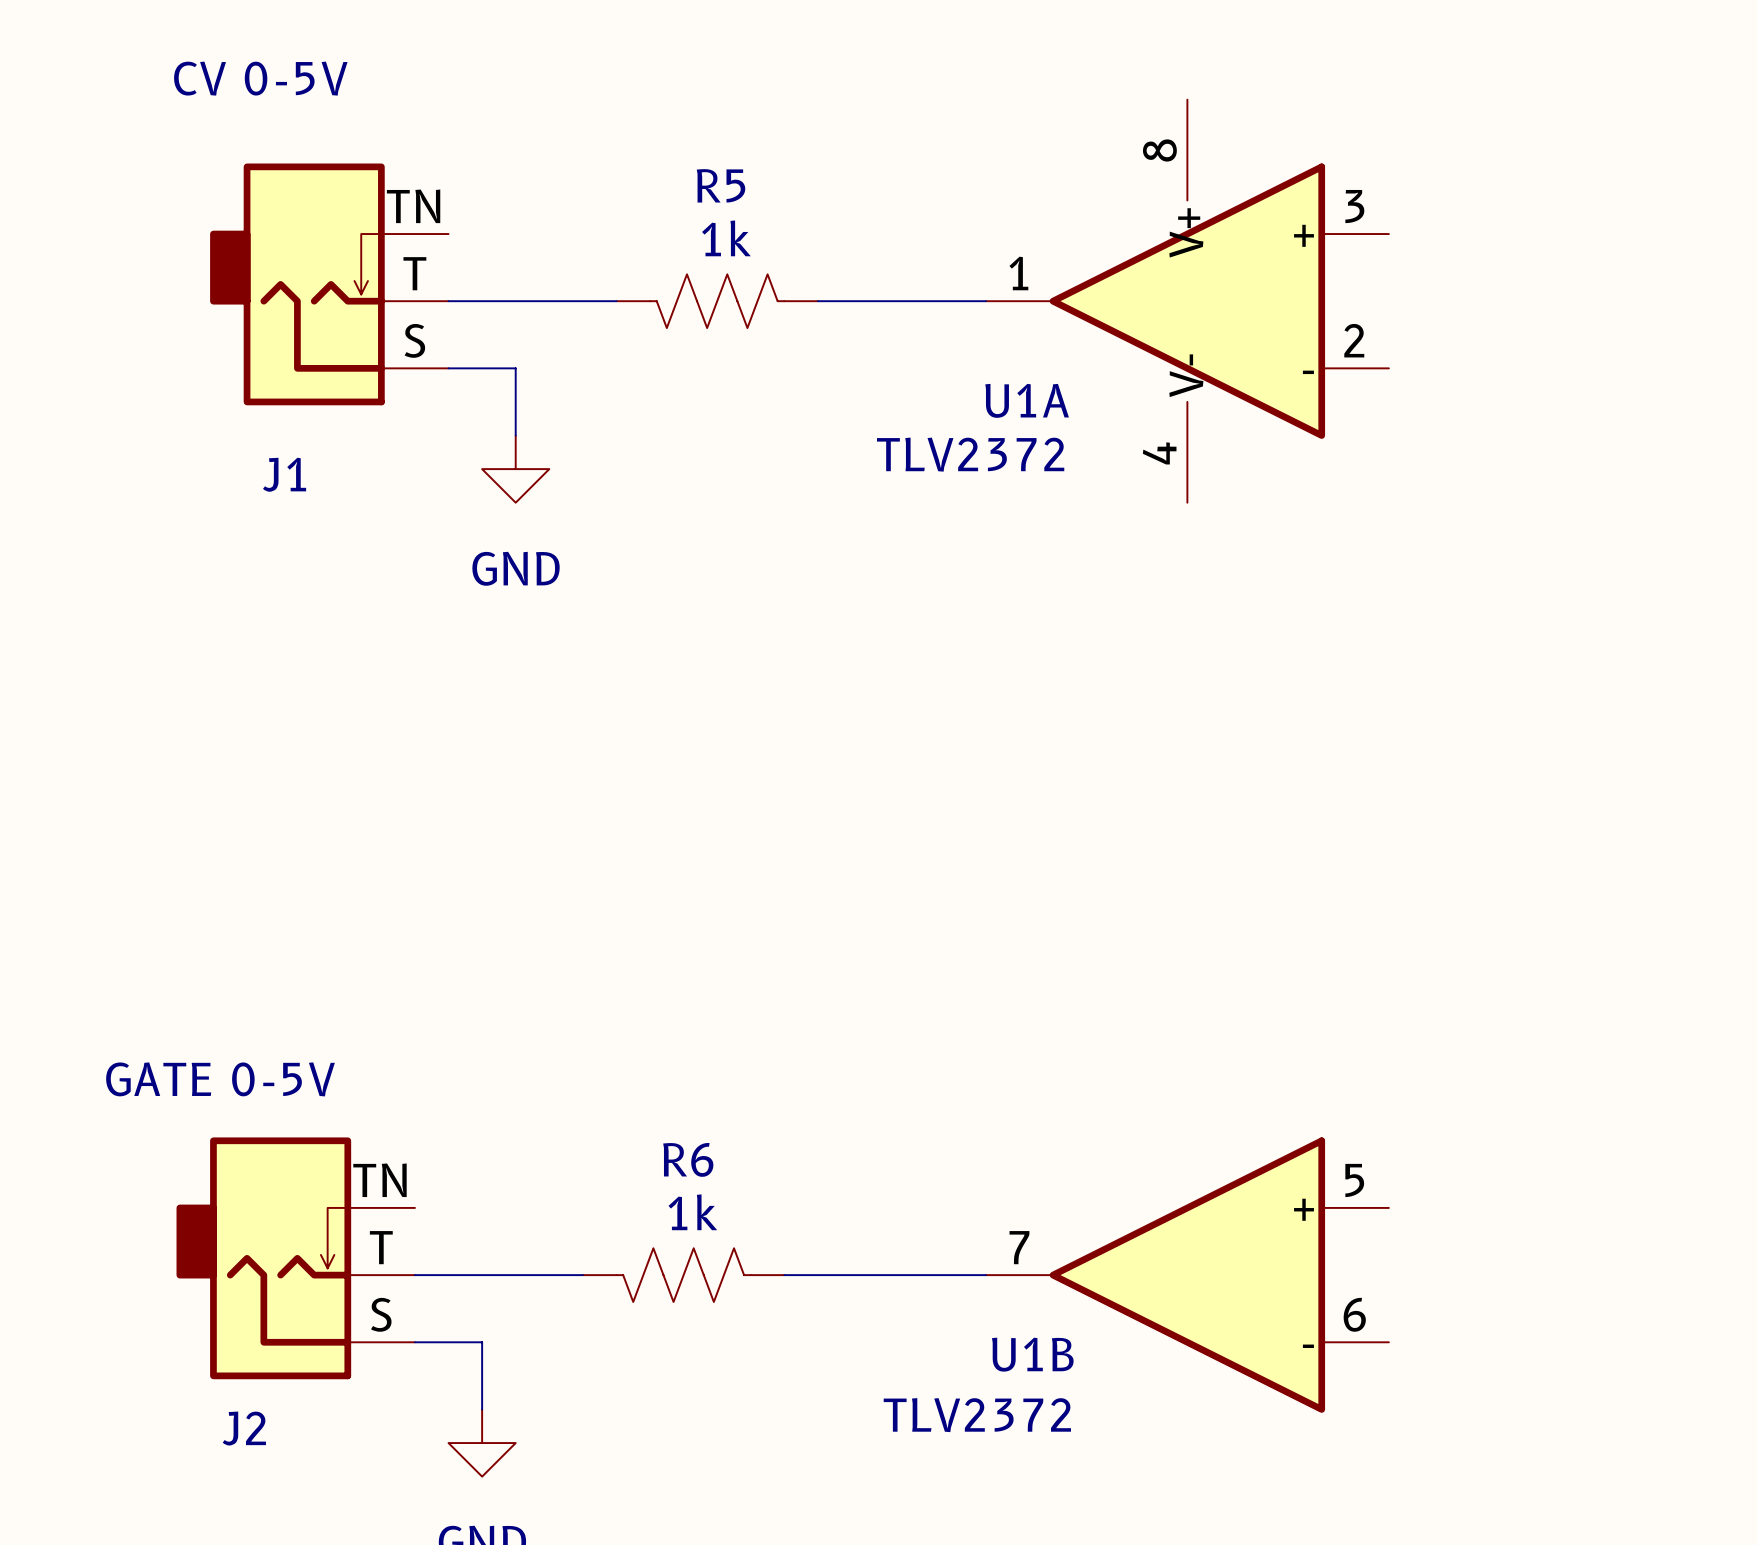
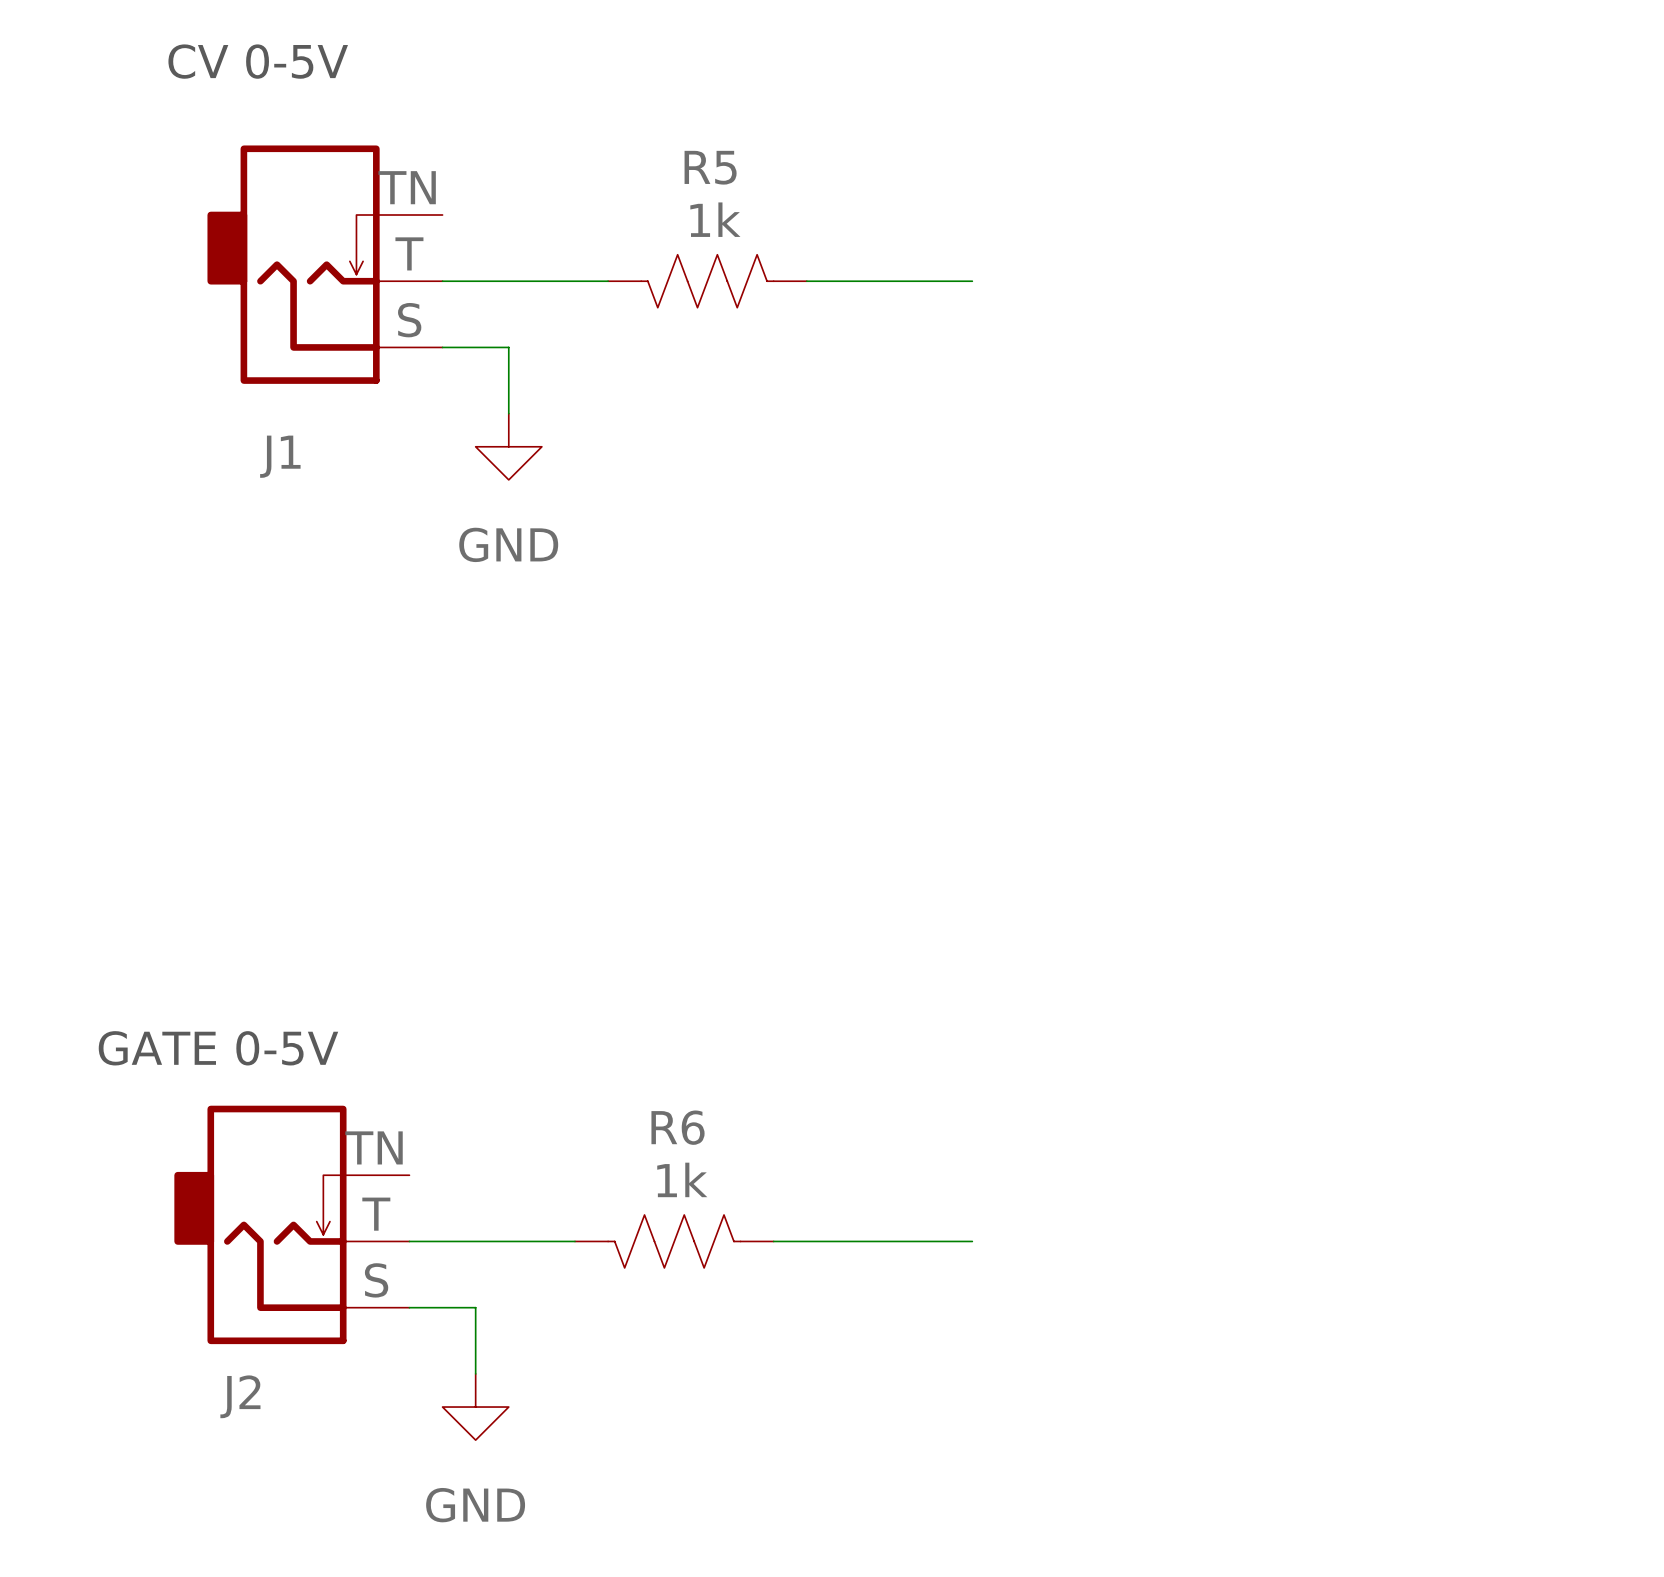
part: (1187, 301) -> none
U1A: TLV2372 (1187, 301) -> none
U1B: TLV2372 (1187, 1275) -> none

